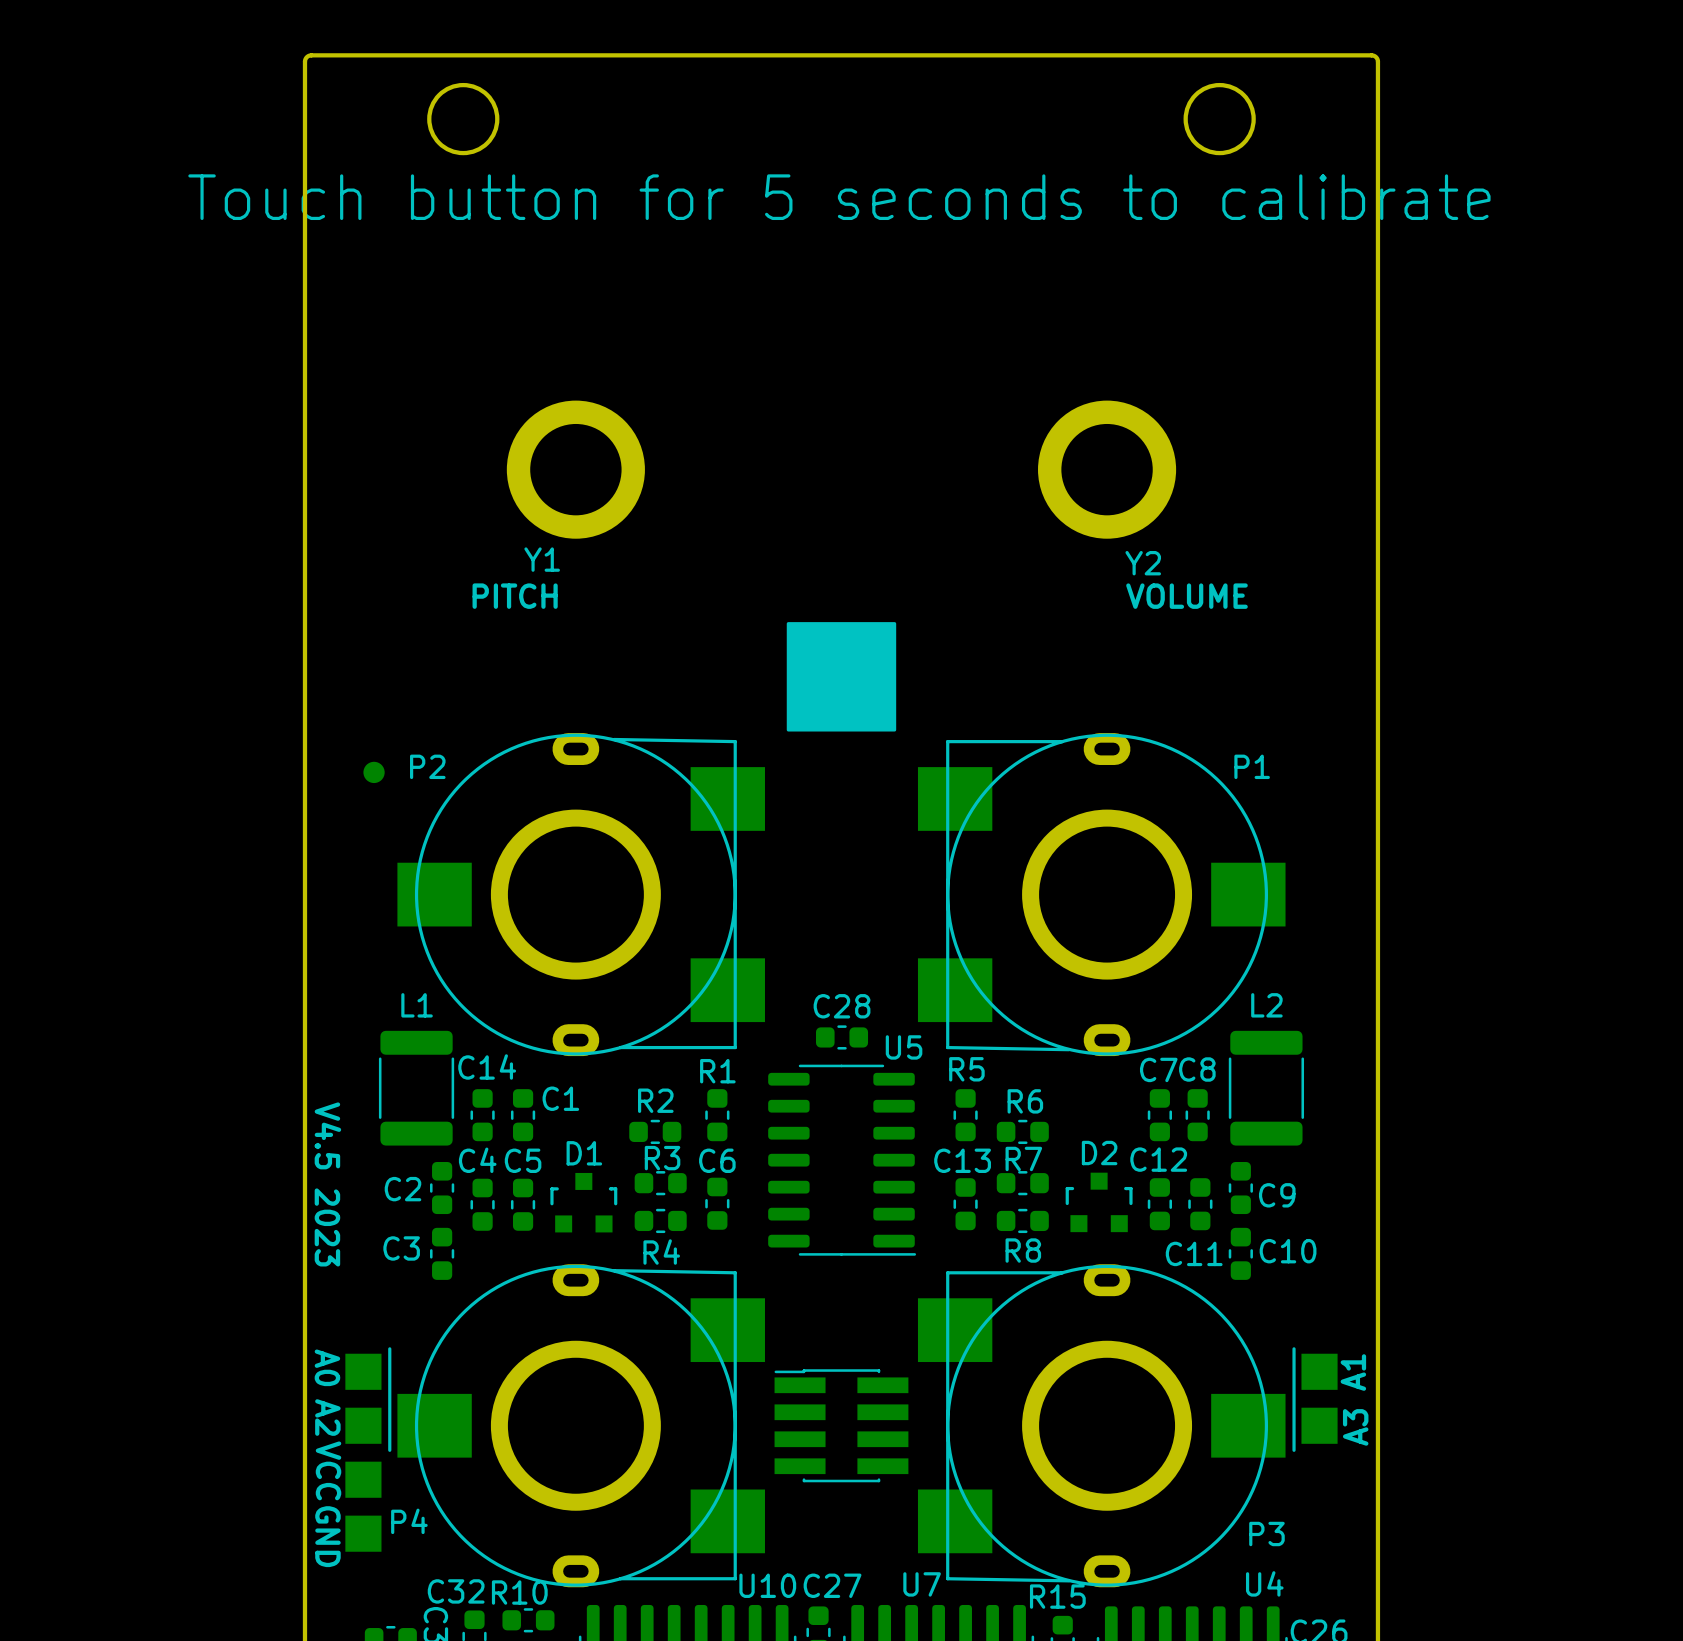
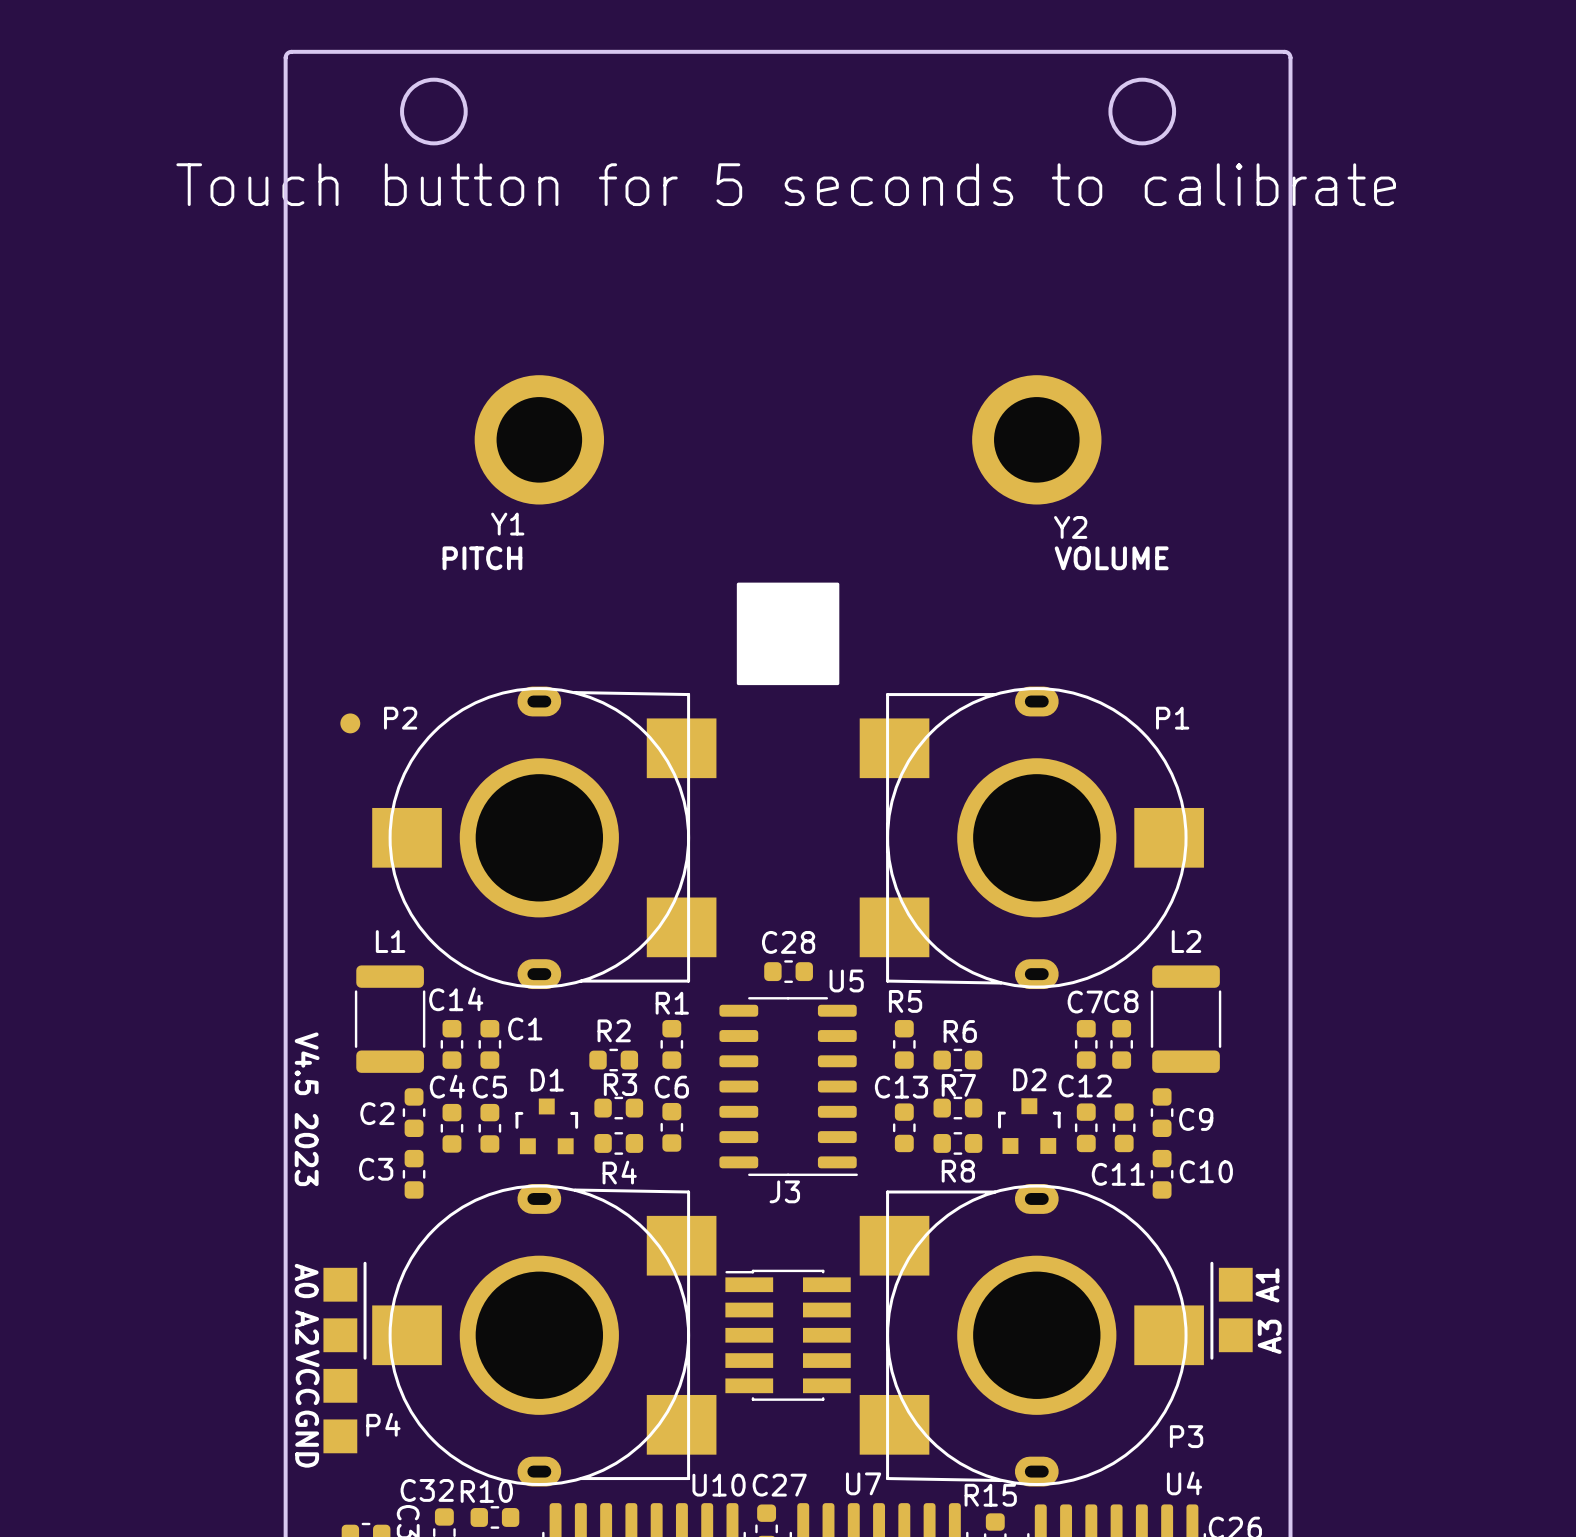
part: (841, 1425) -> none
J3: none -> (788, 1335)

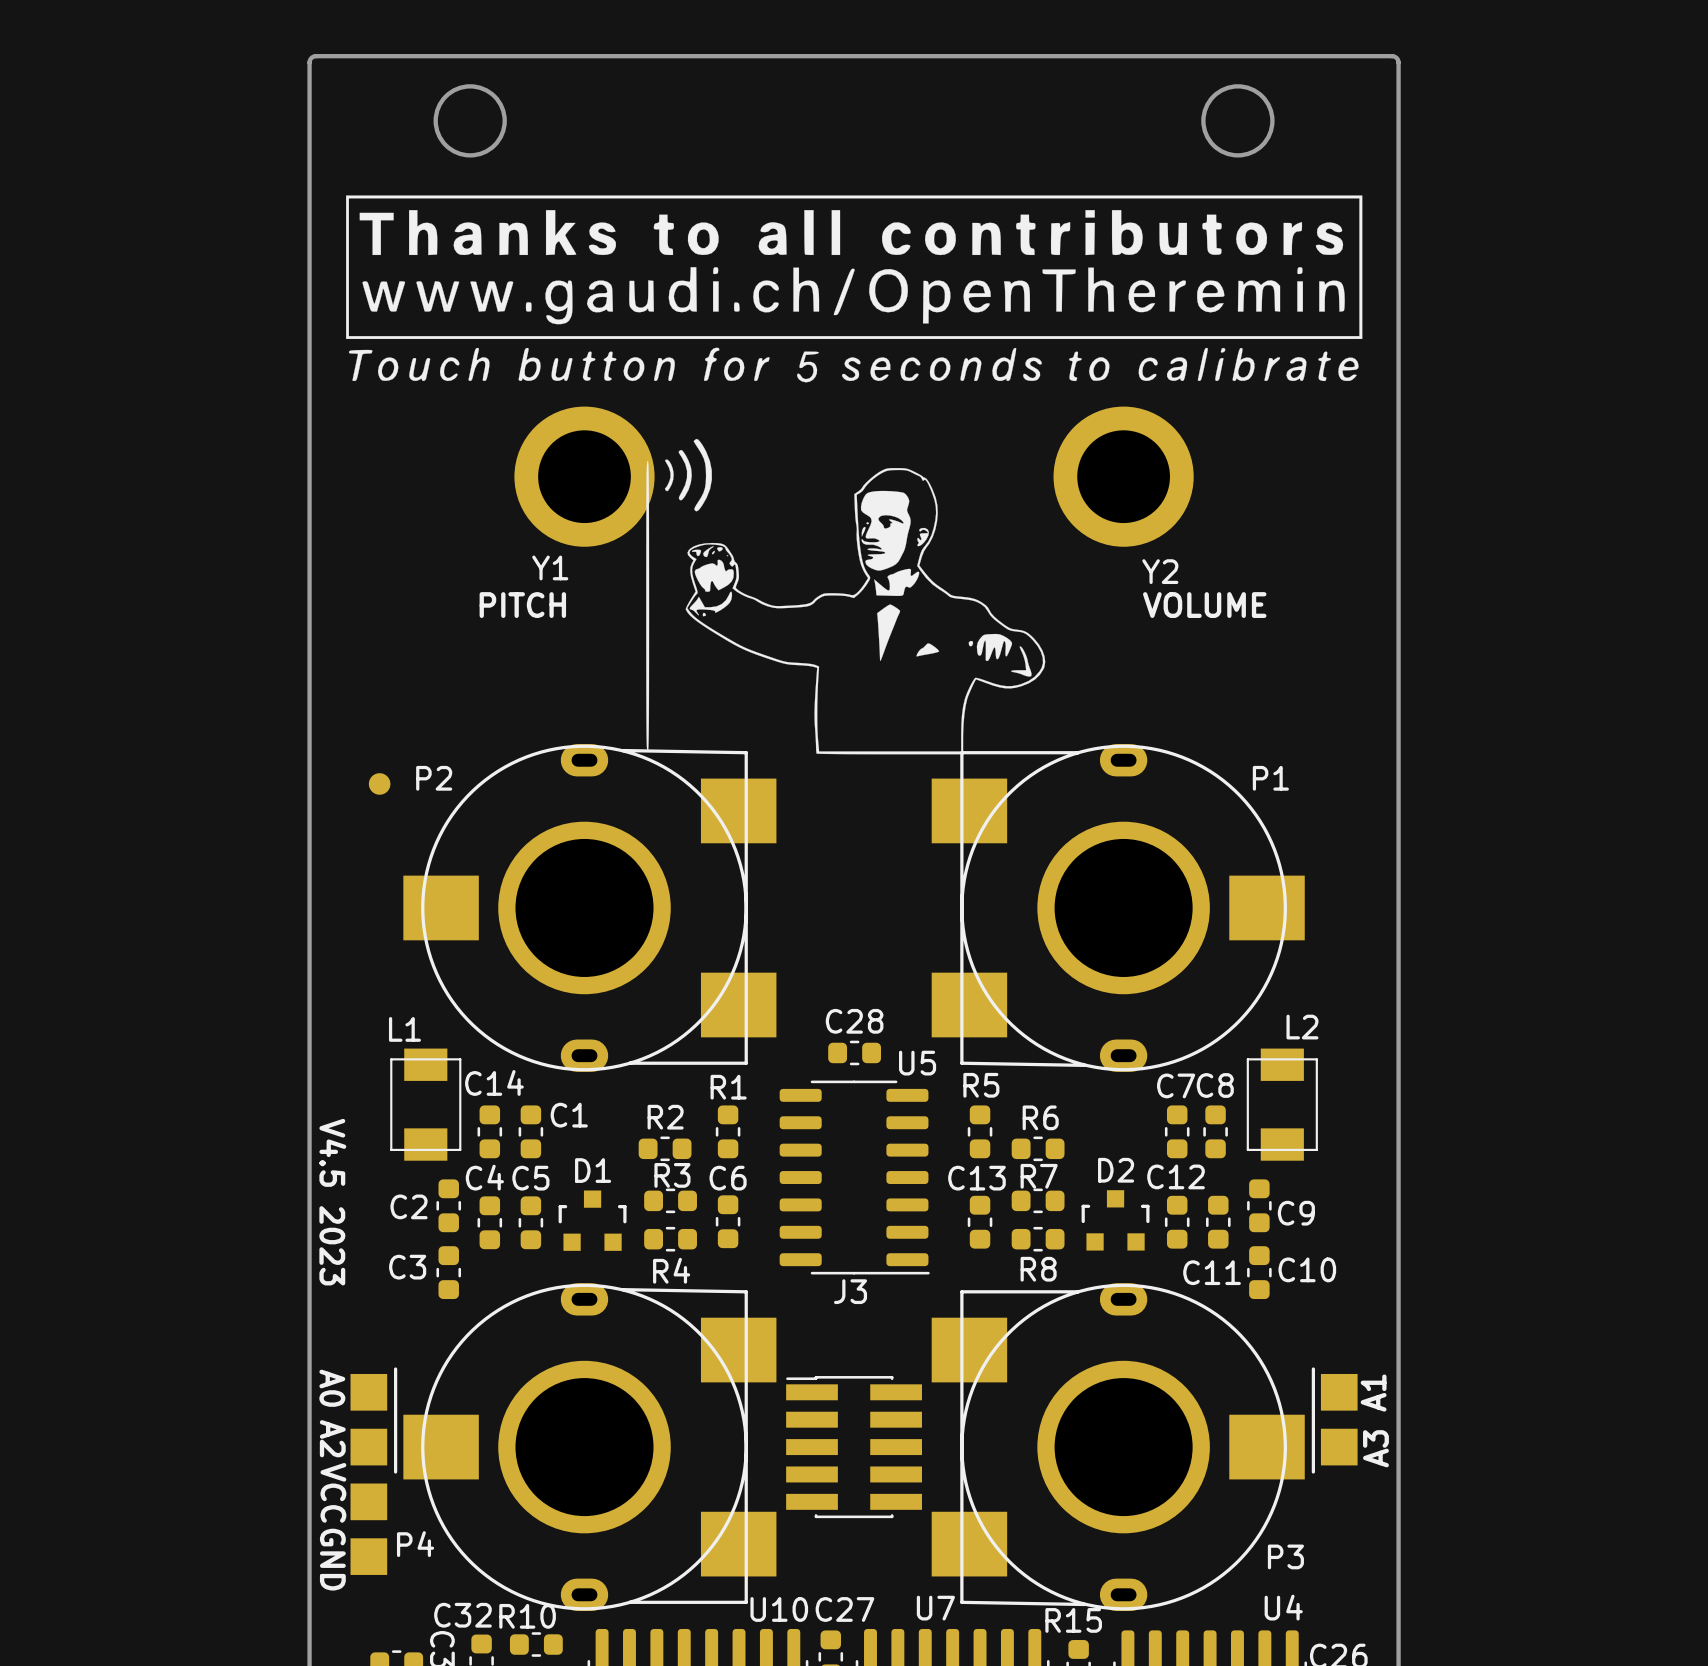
drawing: none -> [346, 195, 1363, 383]
text: Touch button for 5 seconds to calibrate (786, 184) -> none
drawing: none -> [646, 438, 1046, 755]
drawing: [736, 582, 840, 686] -> none
L1 footprint: [354, 965, 426, 1073] -> [390, 1048, 462, 1161]
L2 footprint: [1150, 965, 1222, 1073] -> [1246, 1048, 1318, 1161]

